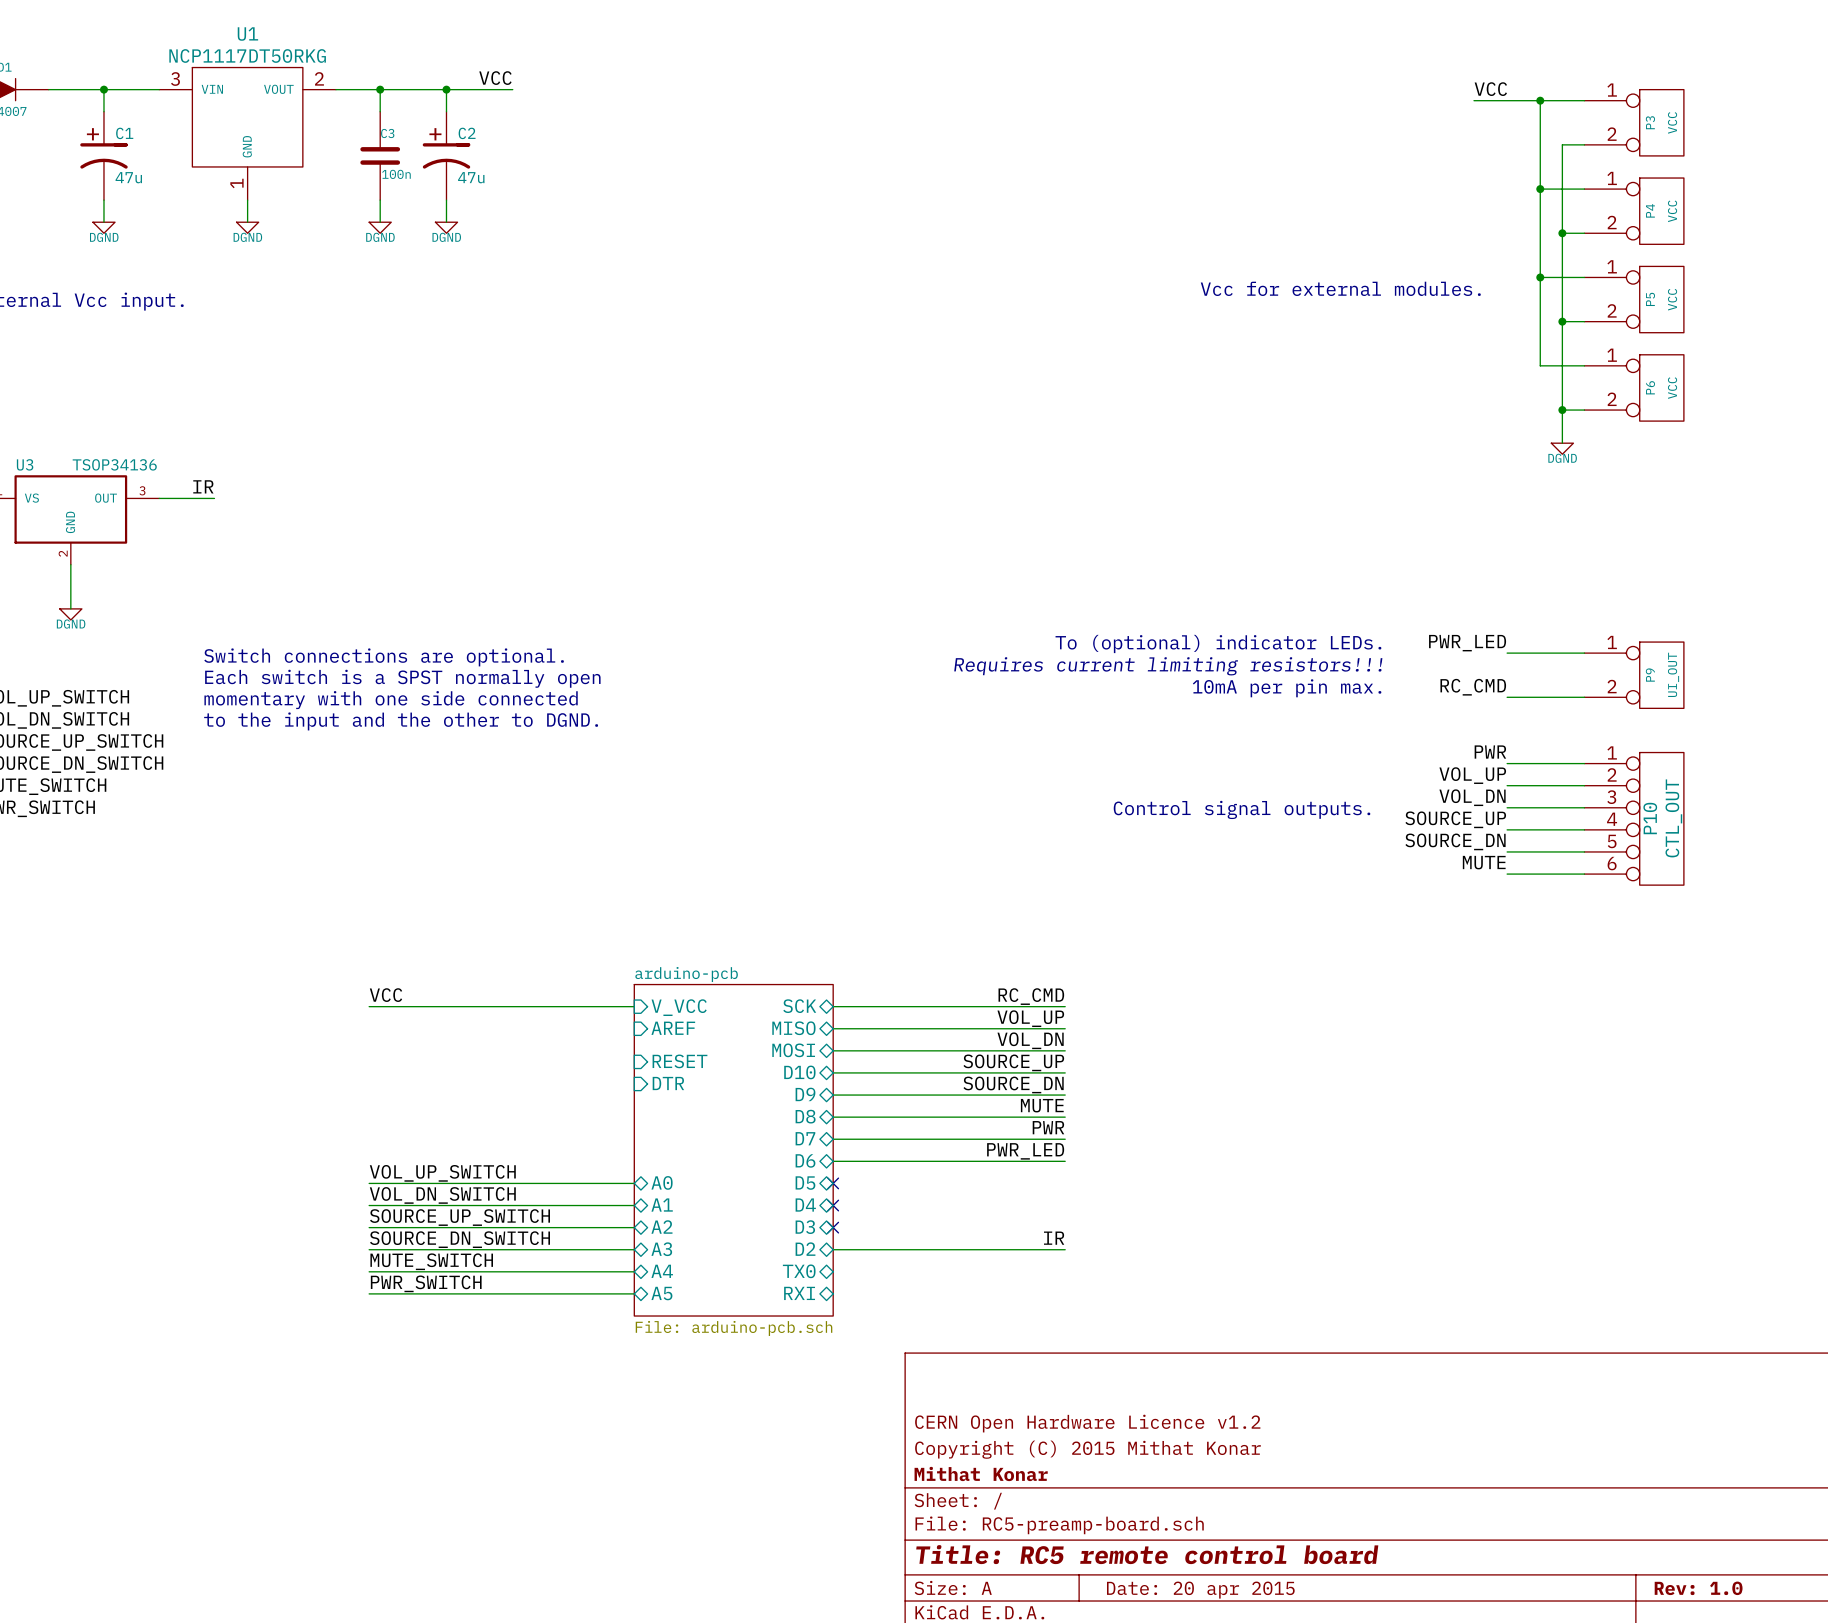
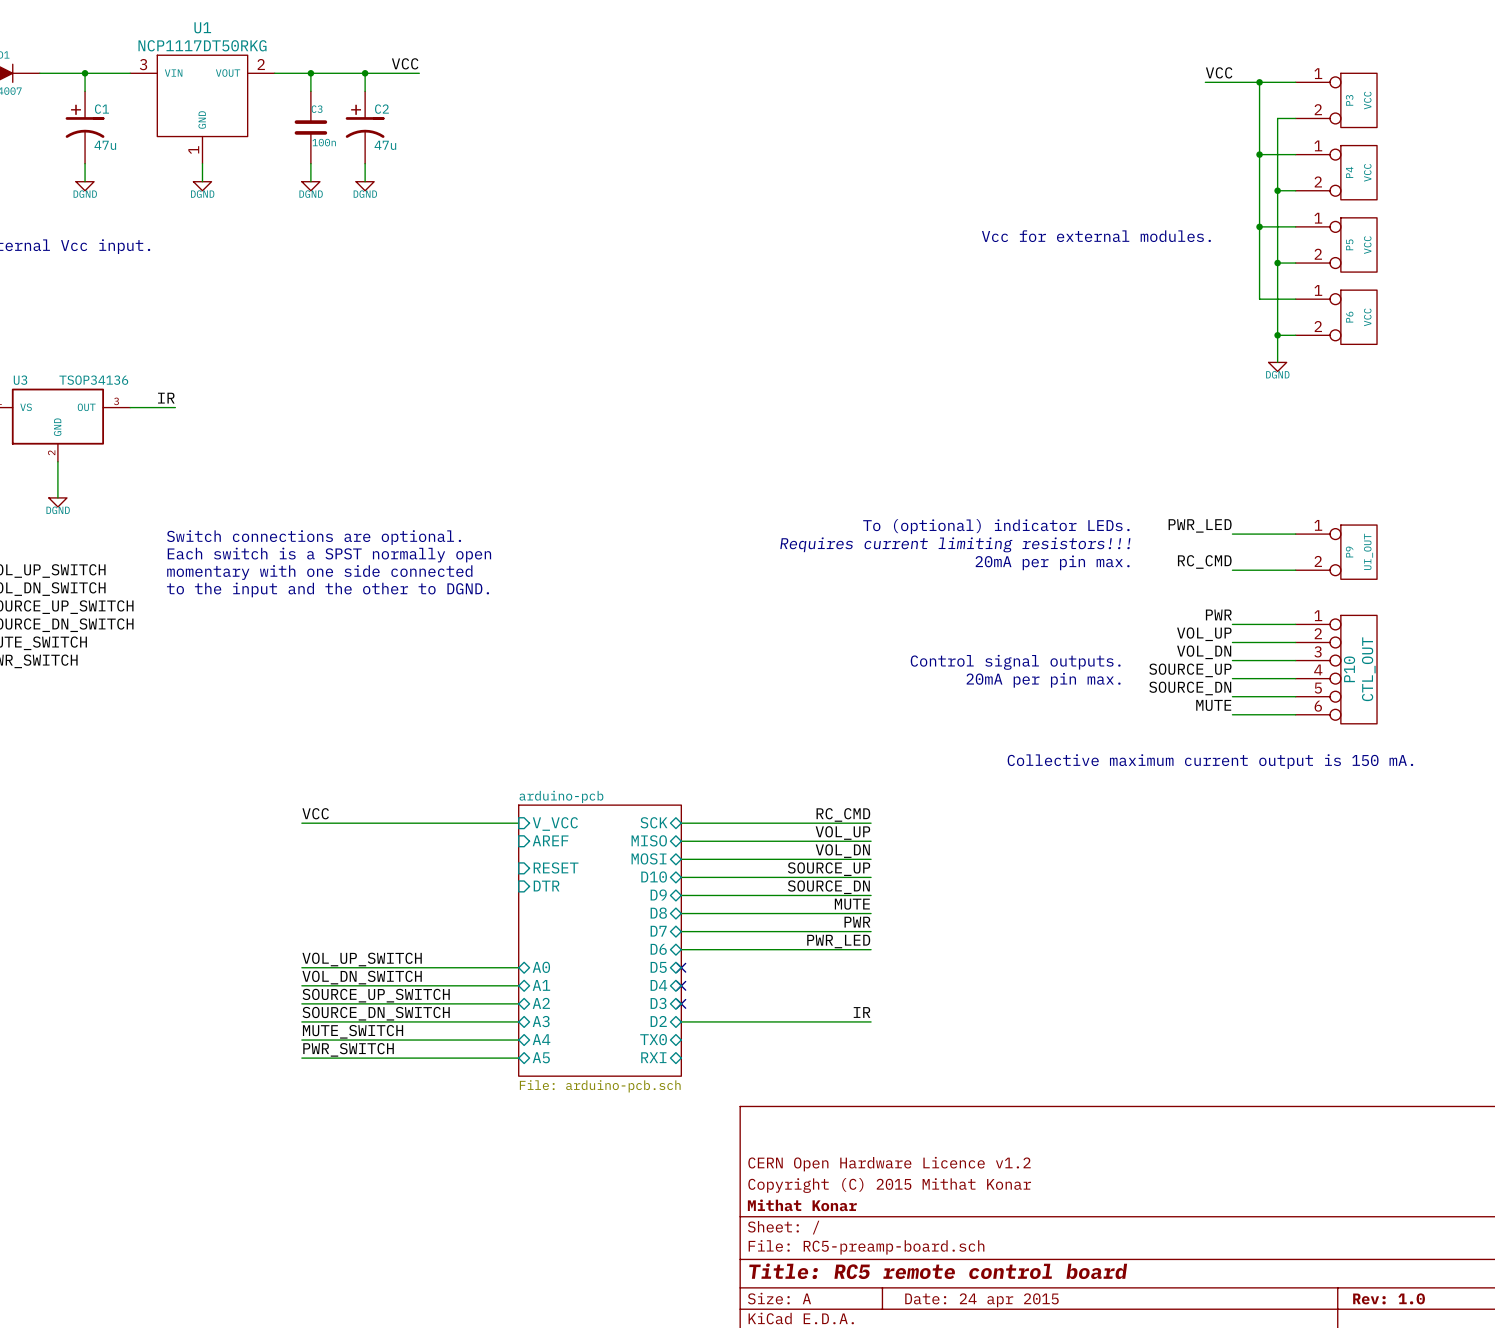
text: 10mA per pin max. (1287, 688) -> 20mA per pin max. (1052, 562)
text: none -> 20mA per pin max. (1043, 680)
text: none -> Collective maximum current output is 150 mA. (1210, 761)
title block: Date: 20 apr 2015 (1200, 1590) -> Date: 24 apr 2015 (981, 1300)

